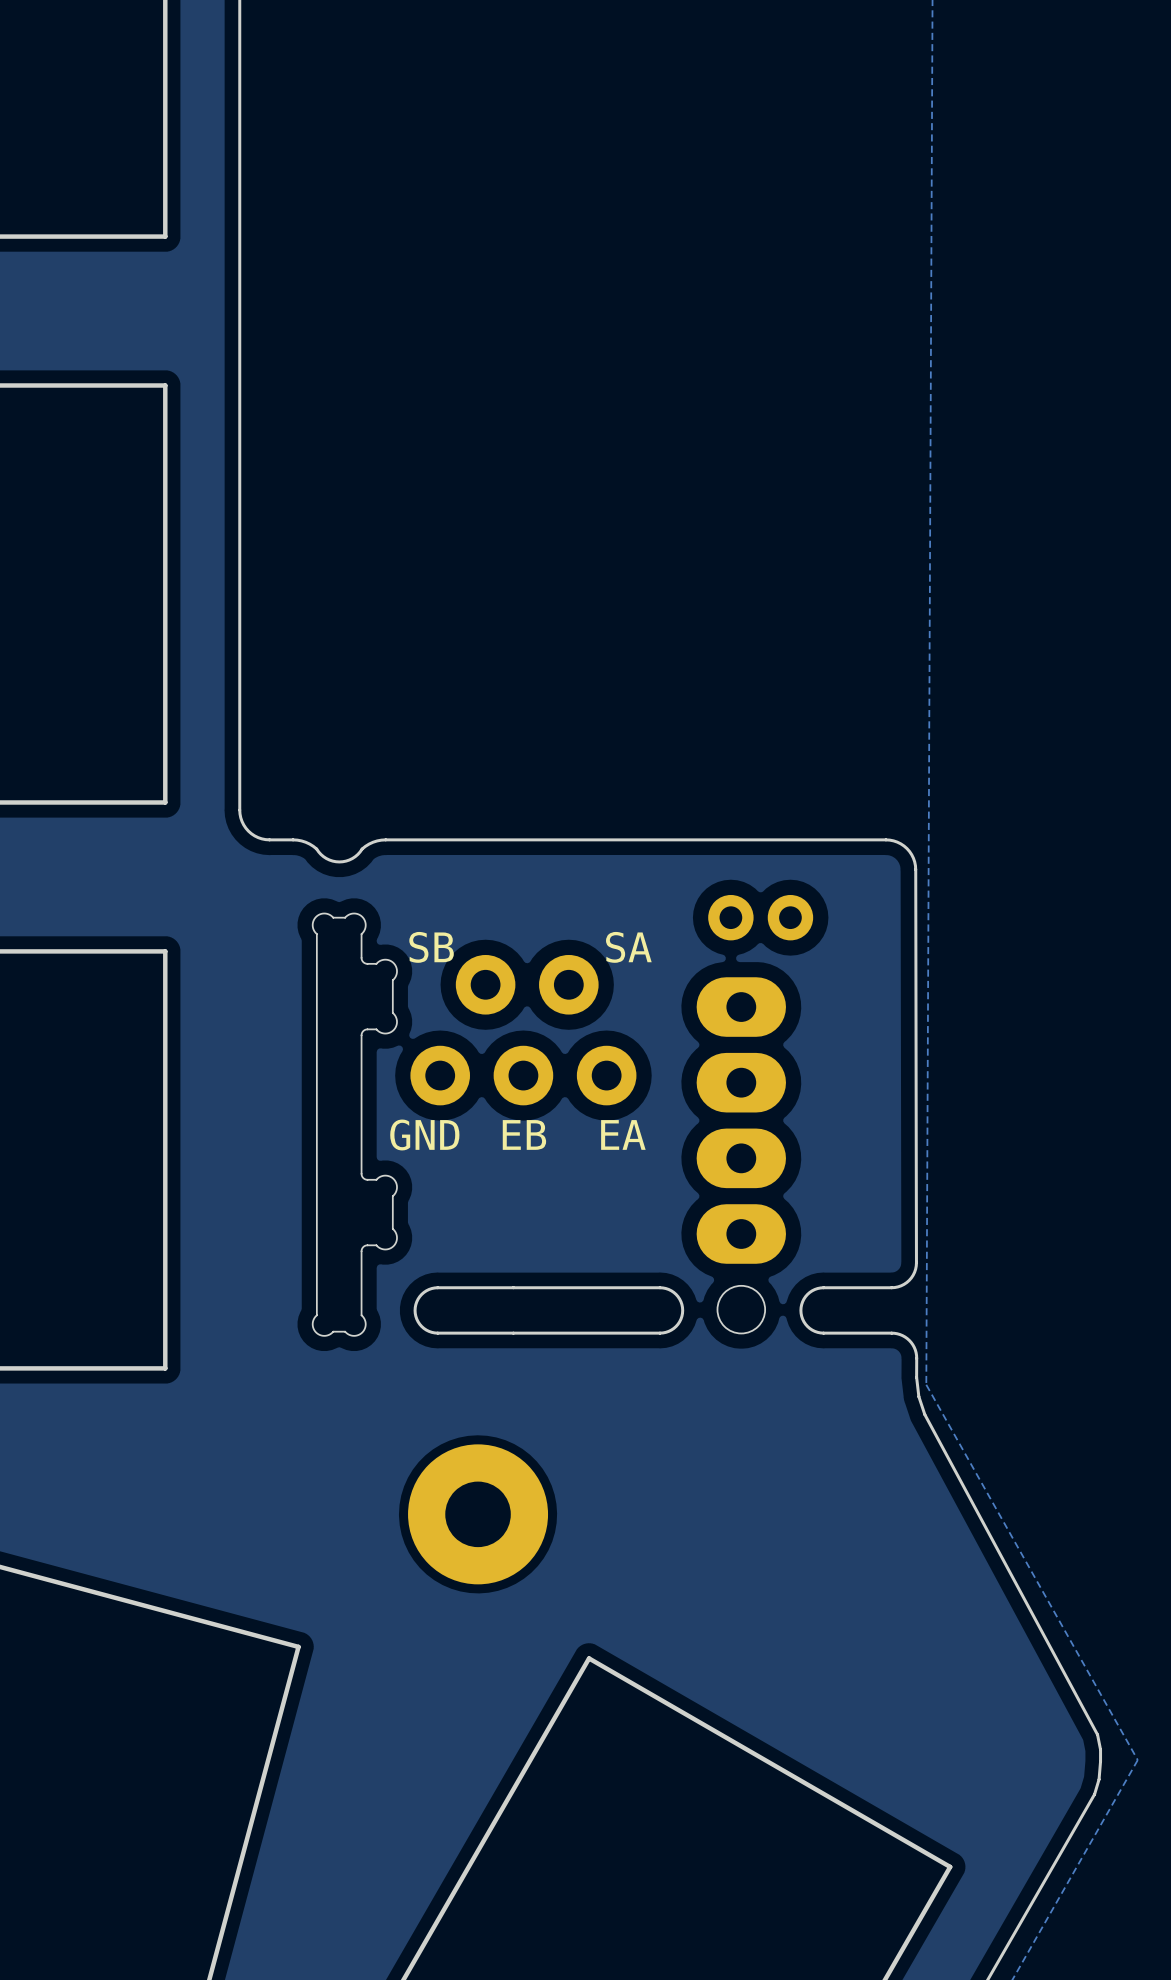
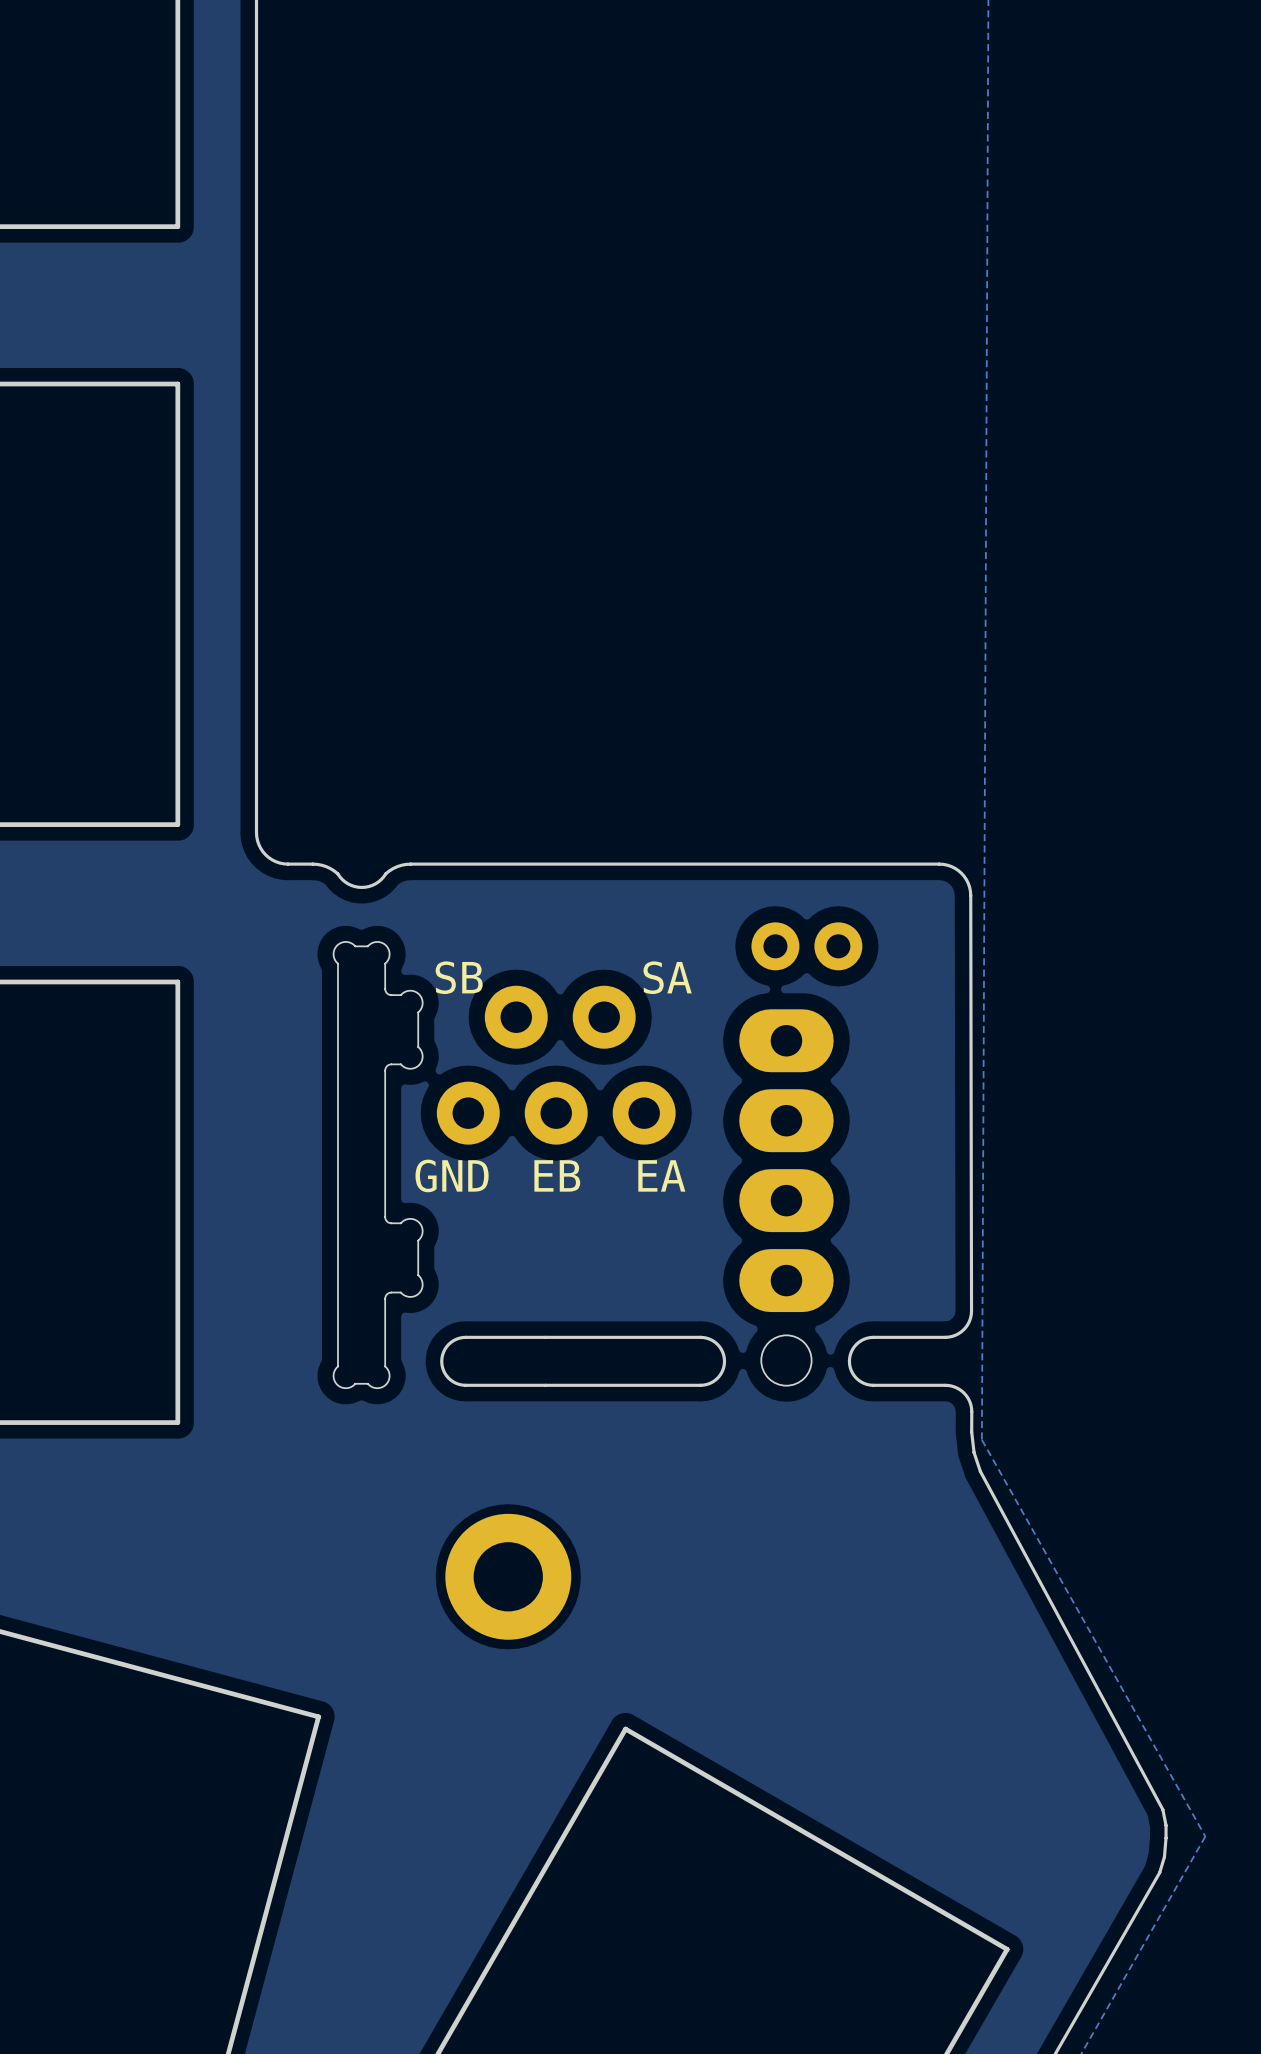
part footprint: [408, 1444, 549, 1585] -> [445, 1513, 572, 1640]

